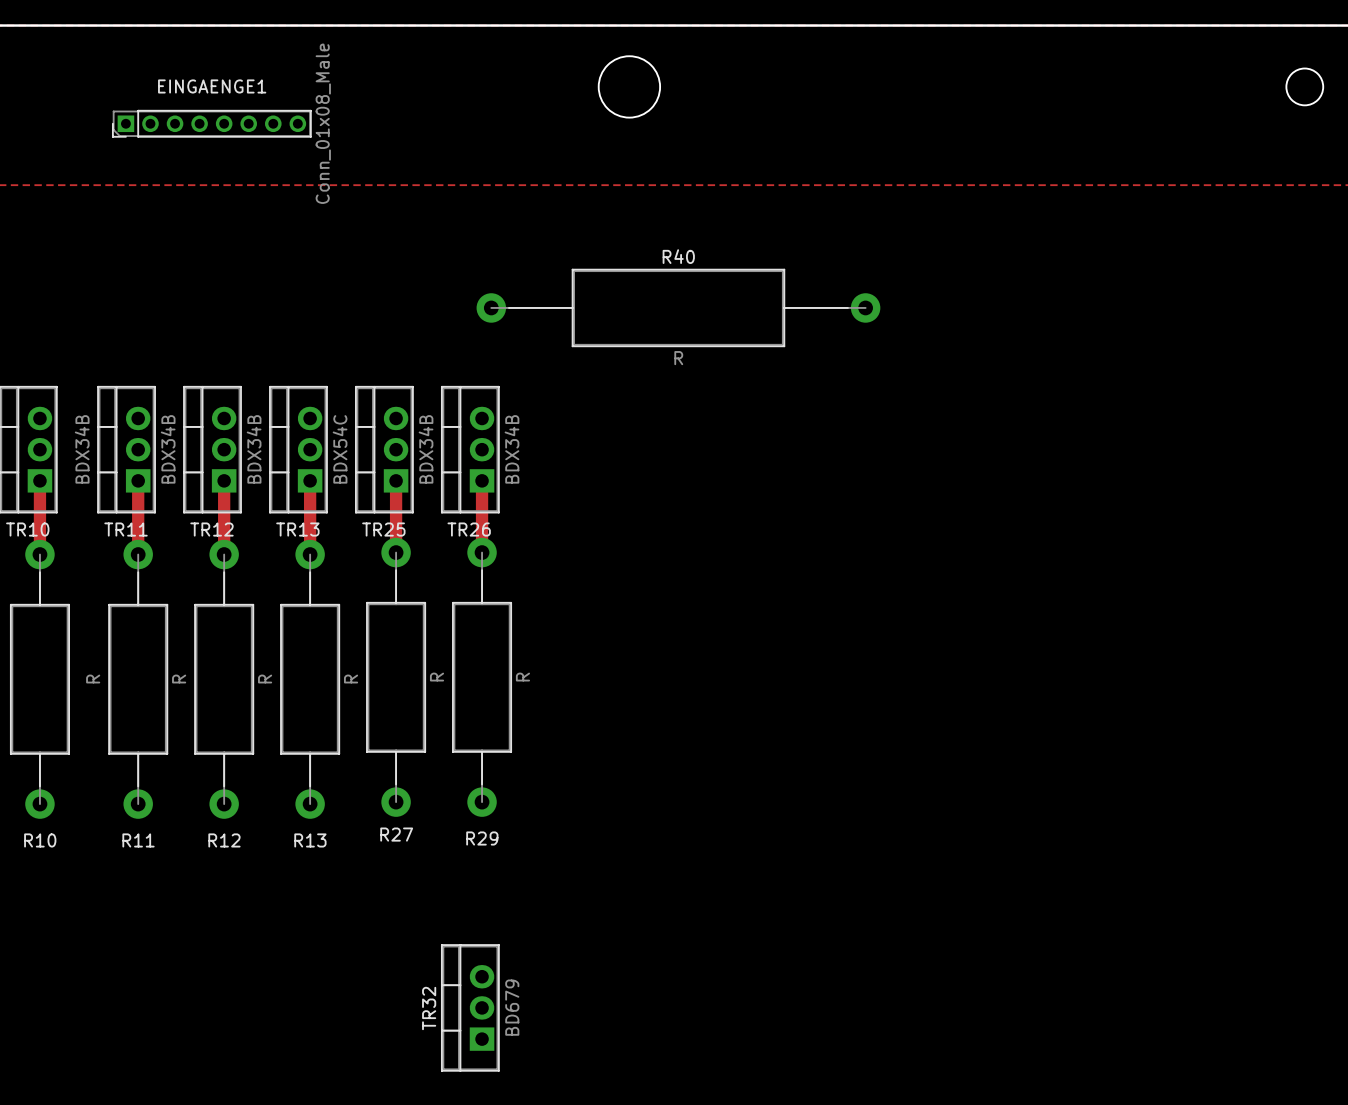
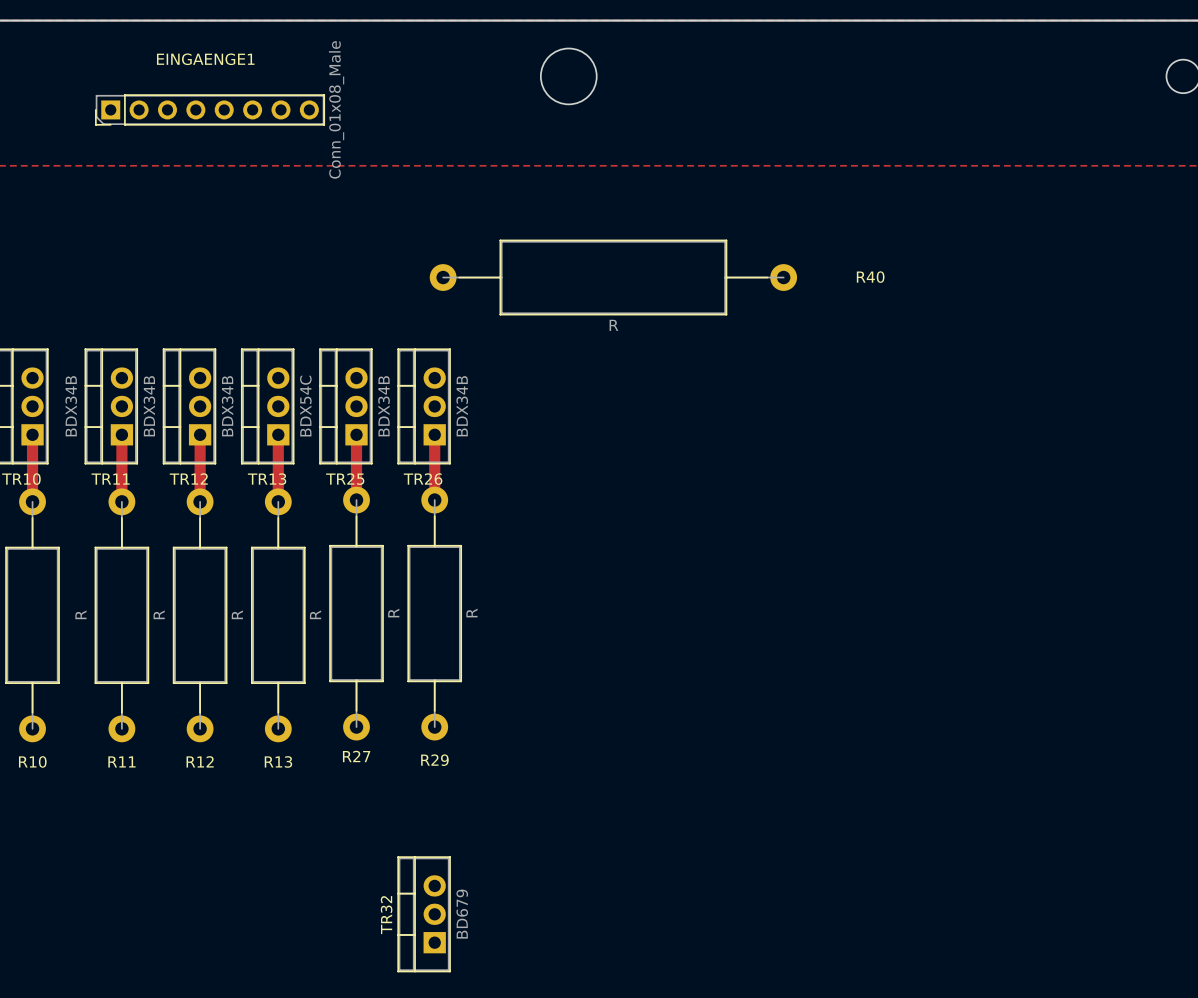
EINGAENGE1 footprint: [112, 110, 312, 138] -> [95, 94, 325, 126]
EINGAENGE1 value position: Conn_01x08_Male (323, 123) -> Conn_01x08_Male (336, 109)
R40 name position: R40 (678, 256) -> R40 (870, 277)
R40 footprint: [476, 268, 881, 348] -> [429, 239, 798, 316]

